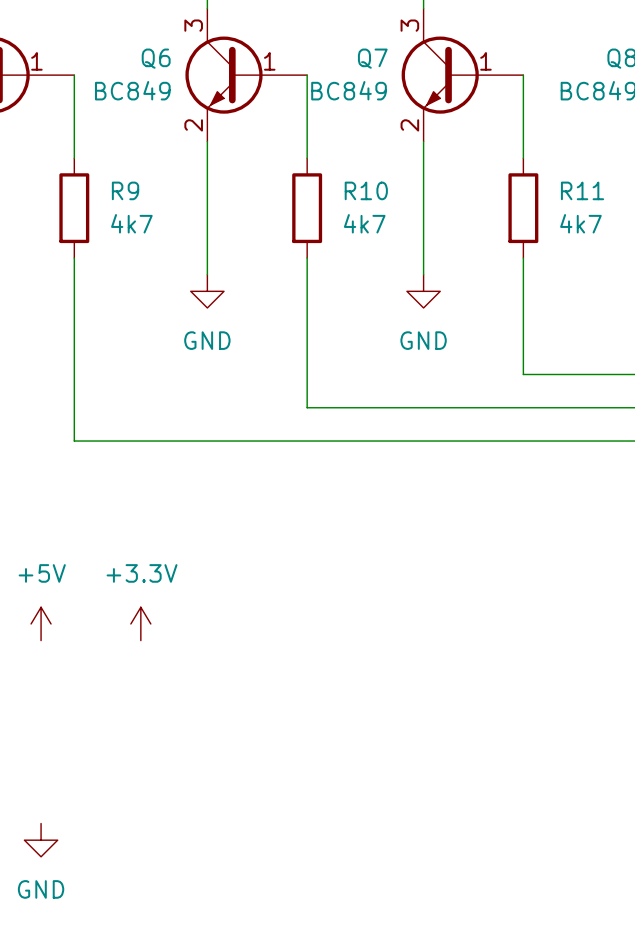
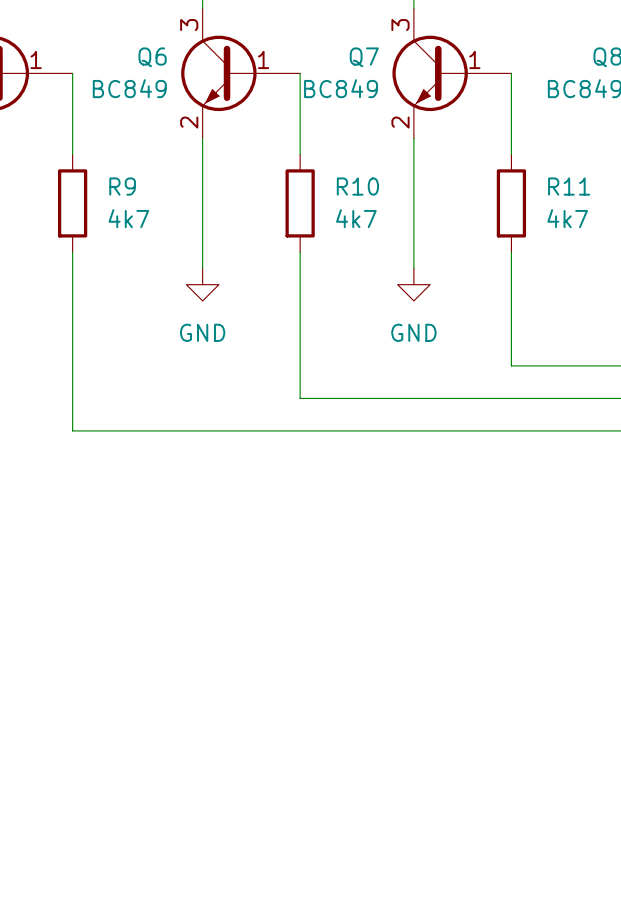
power symbol: +5V (41, 623) -> none
power symbol: +3.3V (140, 623) -> none
power symbol: GND (41, 840) -> none

